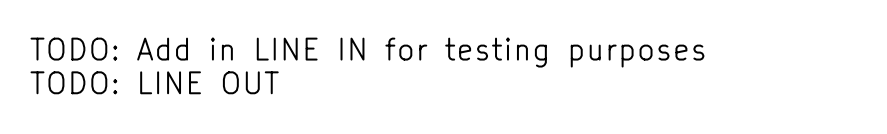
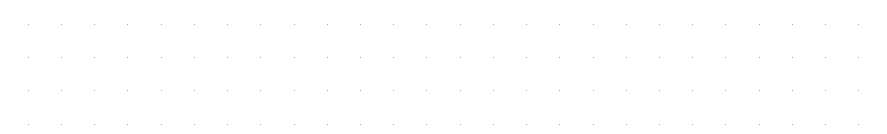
text: TODO: Add in LINE IN for testing purposes (367, 52) -> none
text: TODO: LINE OUT (154, 82) -> none

